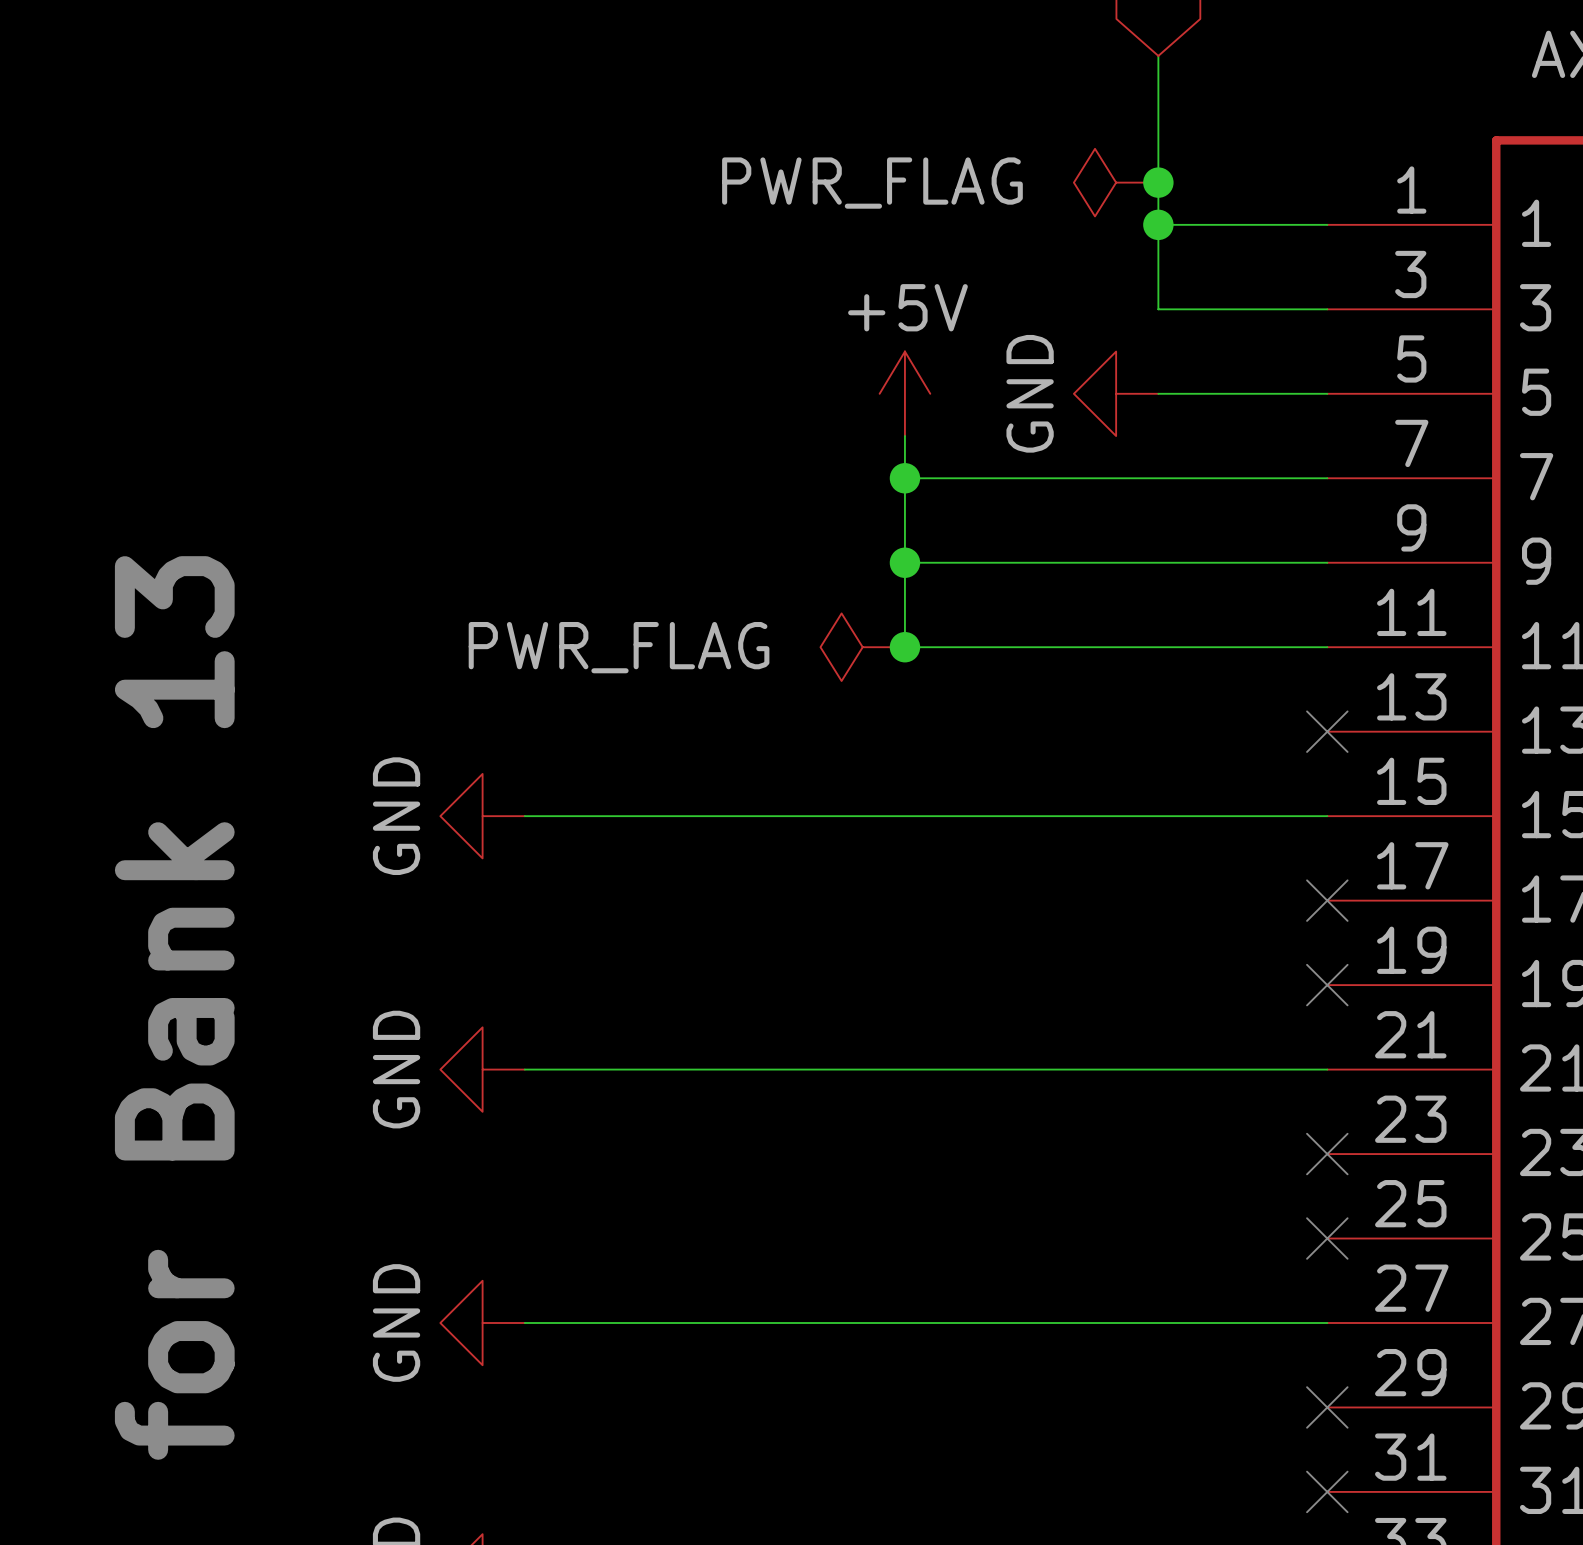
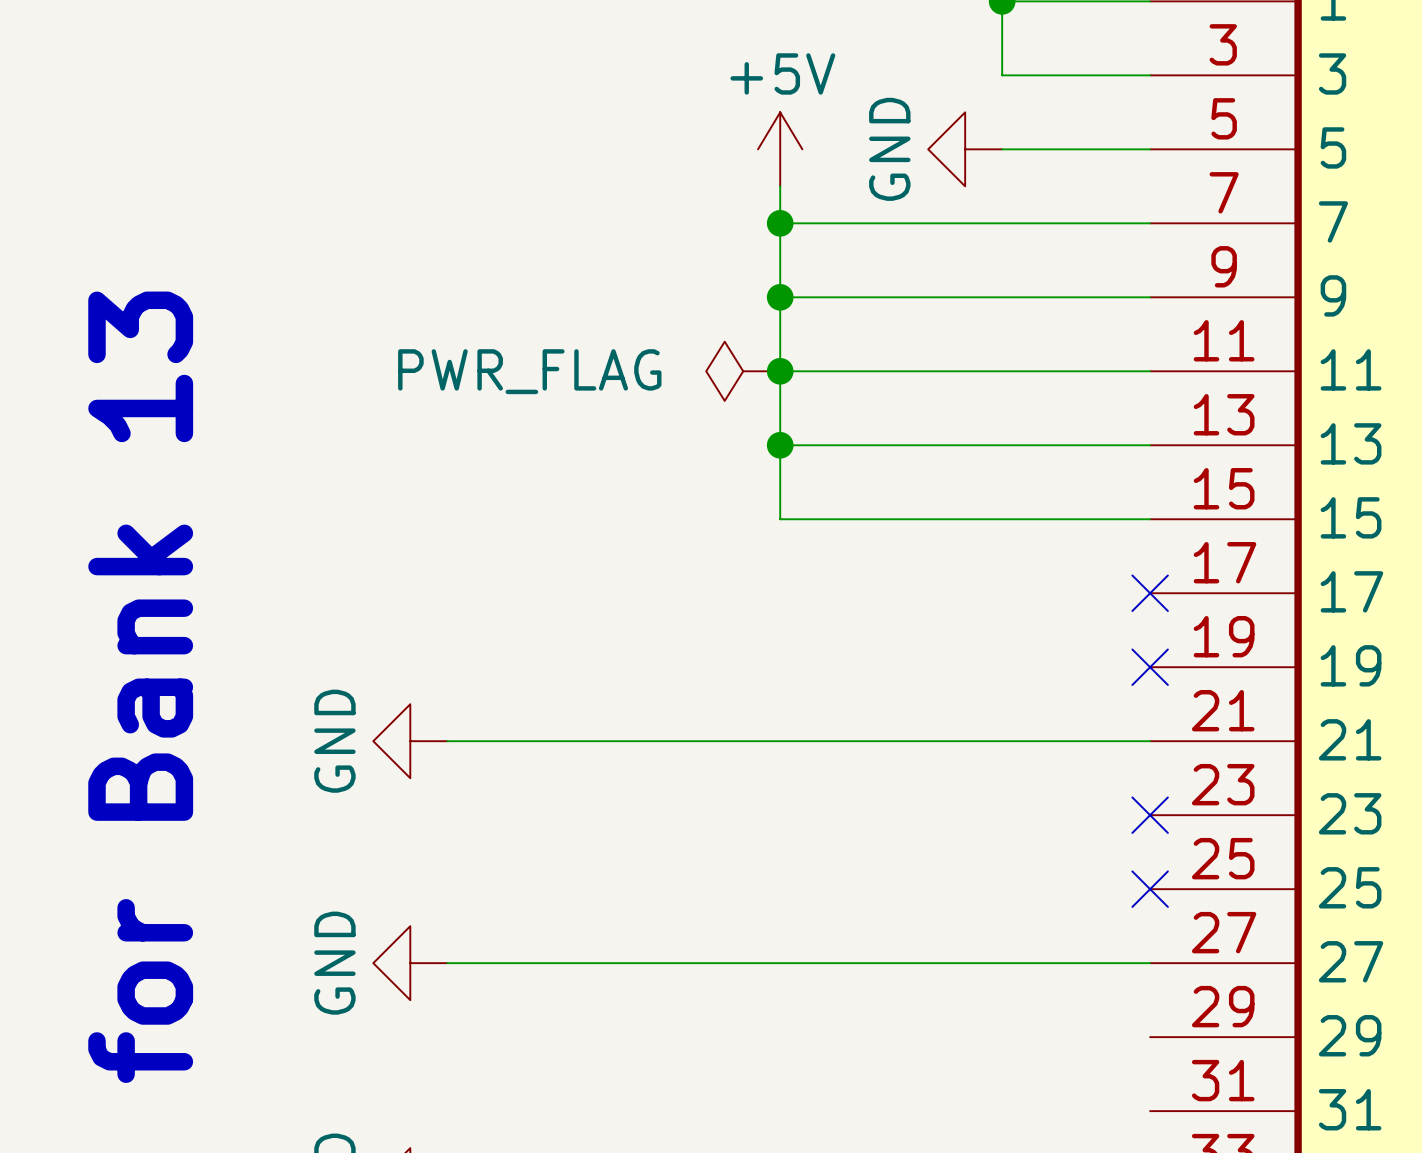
wire: none -> (780, 445) (1150, 445)
junction: none -> (780, 445)
no-connect mark: (1327, 731) -> none
power symbol: GND (482, 816) -> none
wire: (524, 816) (904, 816) -> (780, 371) (780, 519)
no-connect mark: (1327, 1407) -> none
no-connect mark: (1327, 1491) -> none

